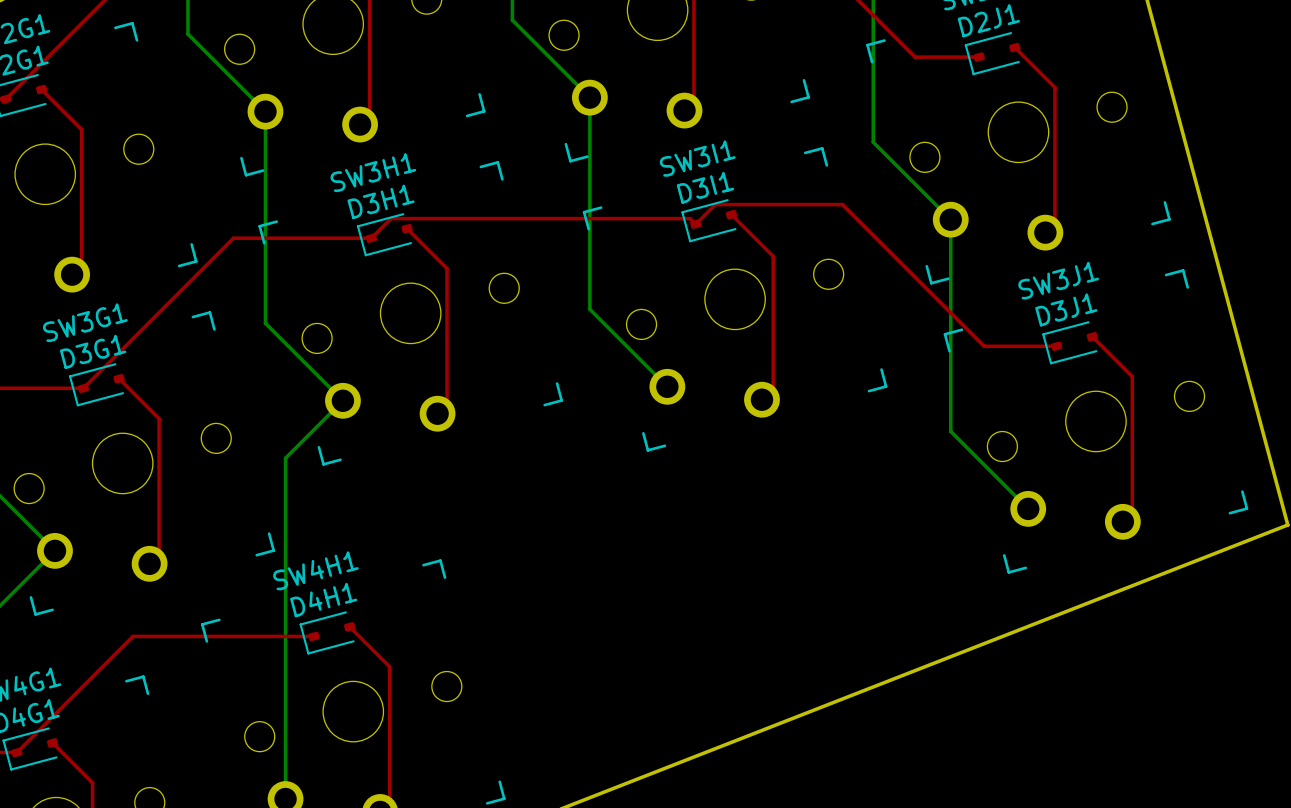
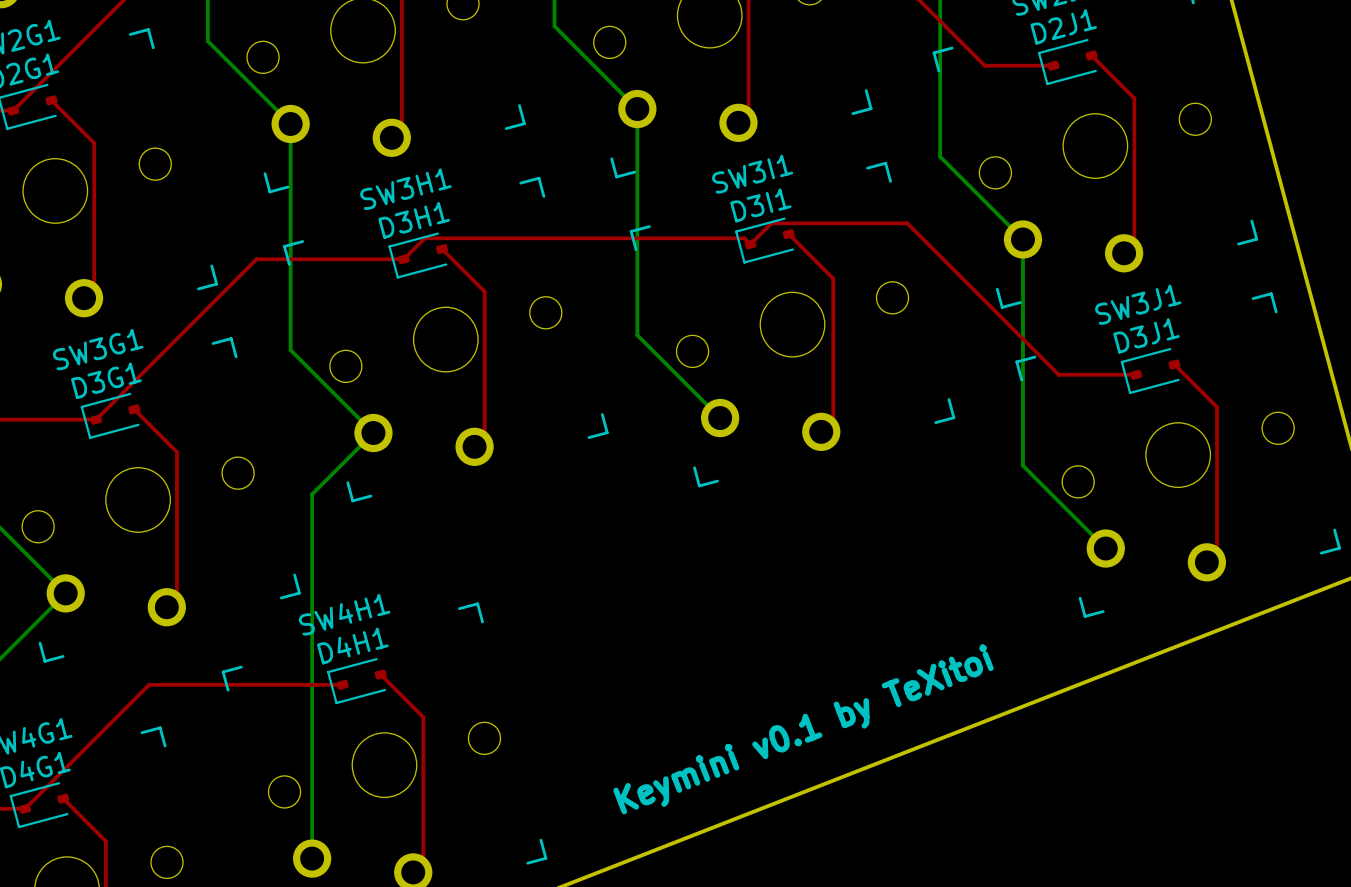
text: none -> Keymini v0.1 by TeXitoi (803, 729)

